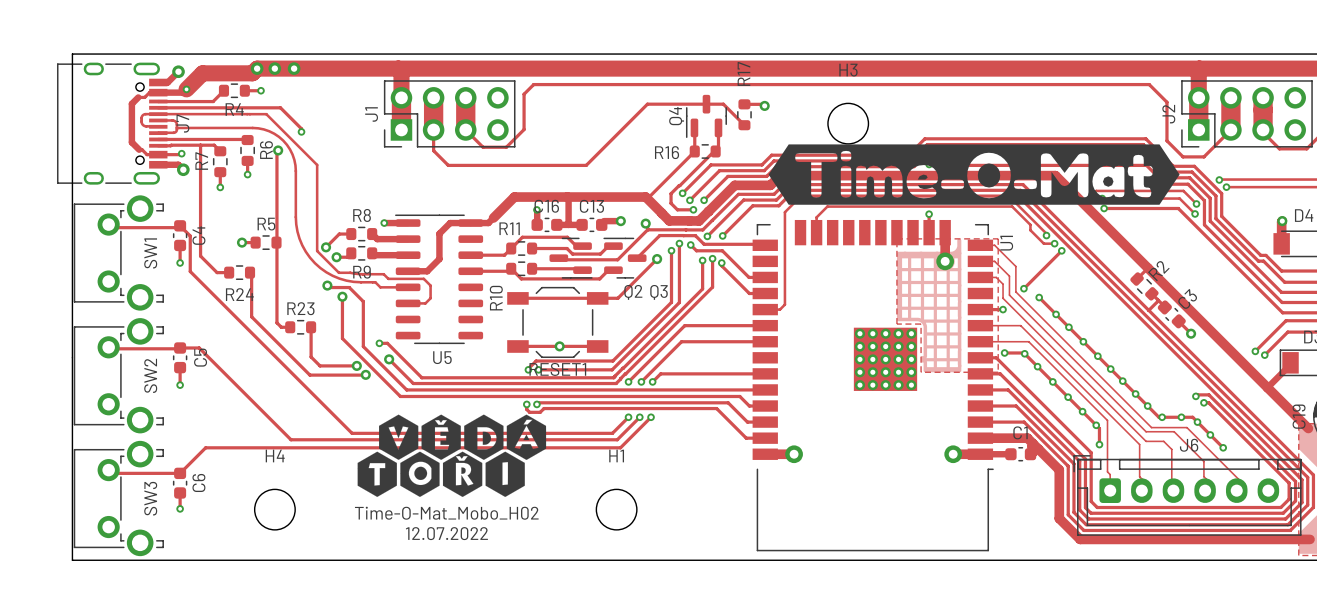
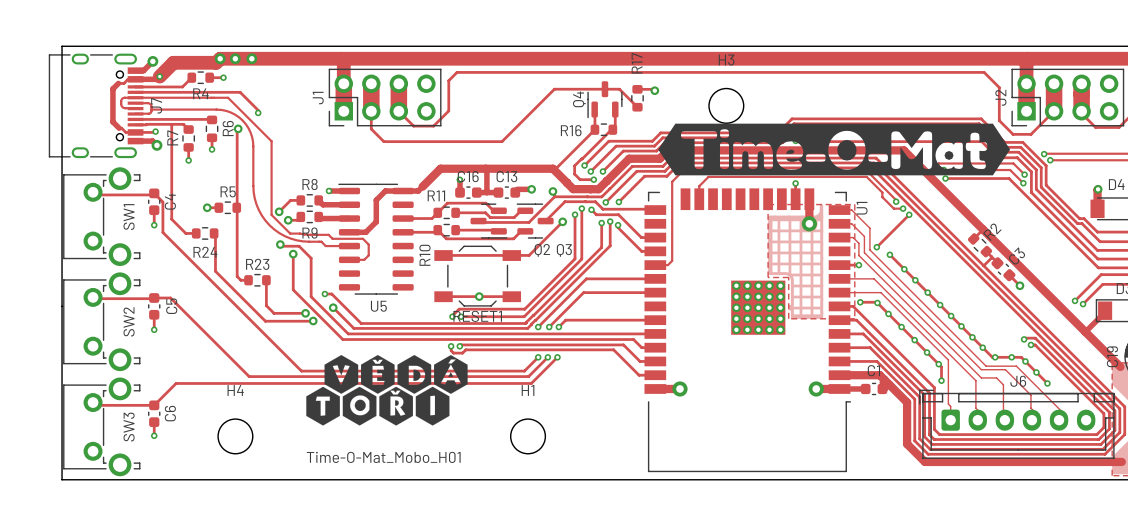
text: Time-O-Mat_Mobo_H02 (446, 513) -> none
text: 12.07.2022 (446, 533) -> Time-O-Mat_Mobo_H01 (383, 457)

